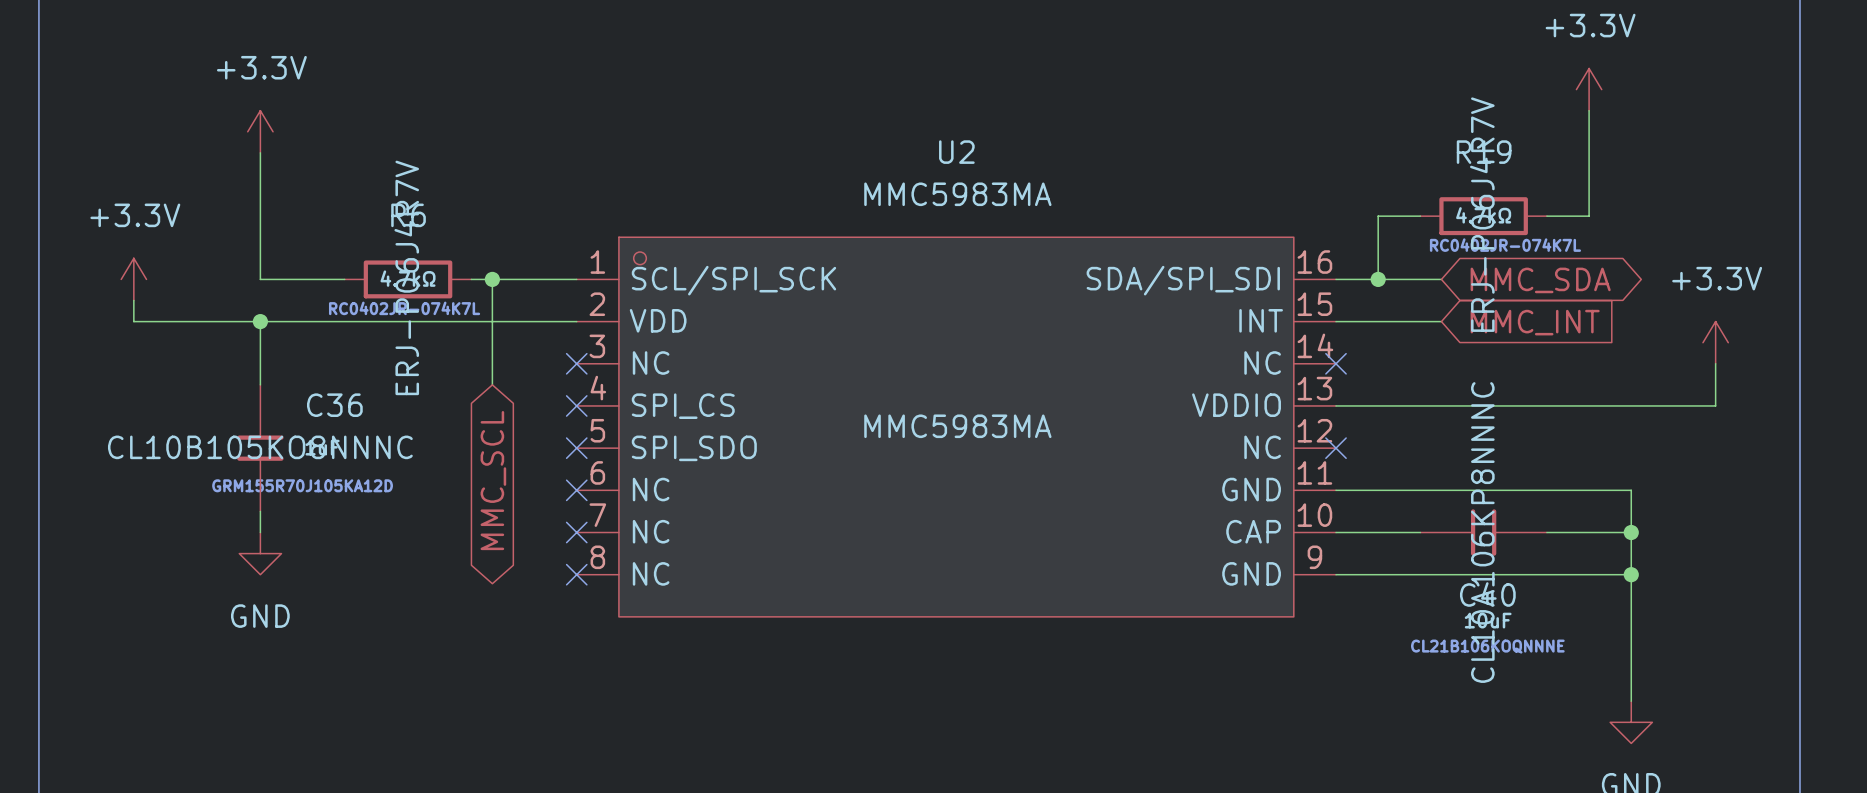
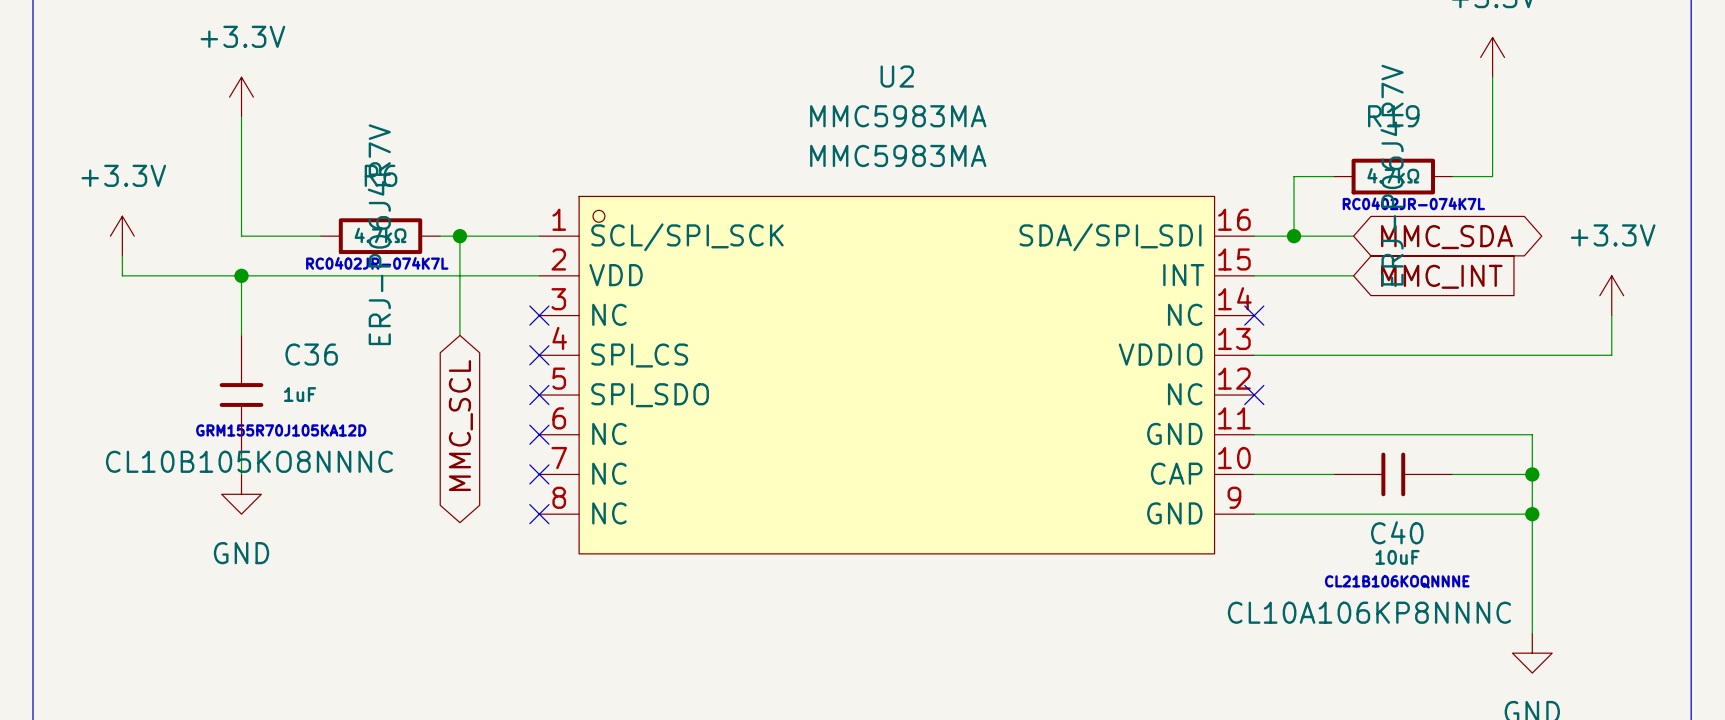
U2 name position: U2 (956, 152) -> U2 (897, 76)
U2 value position: MMC5983MA (957, 194) -> MMC5983MA (898, 116)
U2 text position: MMC5983MA (957, 426) -> MMC5983MA (898, 155)
C36 text position: CL10B105KO8NNNC (260, 447) -> CL10B105KO8NNNC (249, 461)
C40 text rotation: 0° (1482, 532) -> 90° clockwise (1369, 612)

